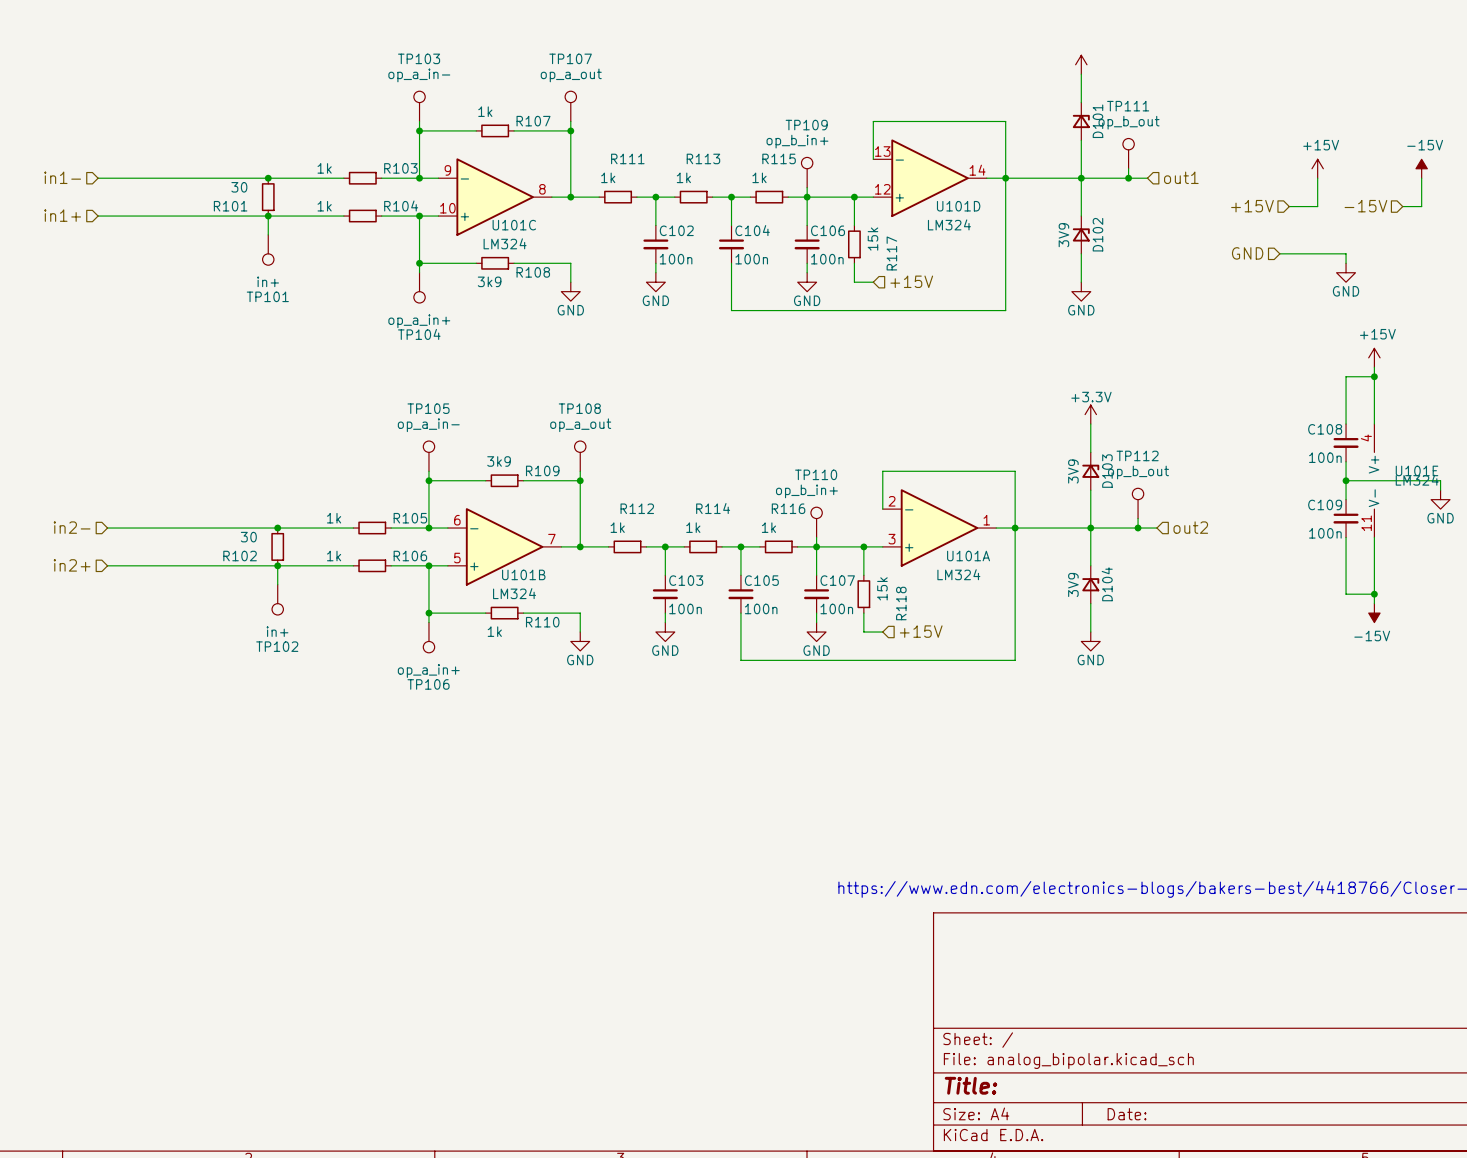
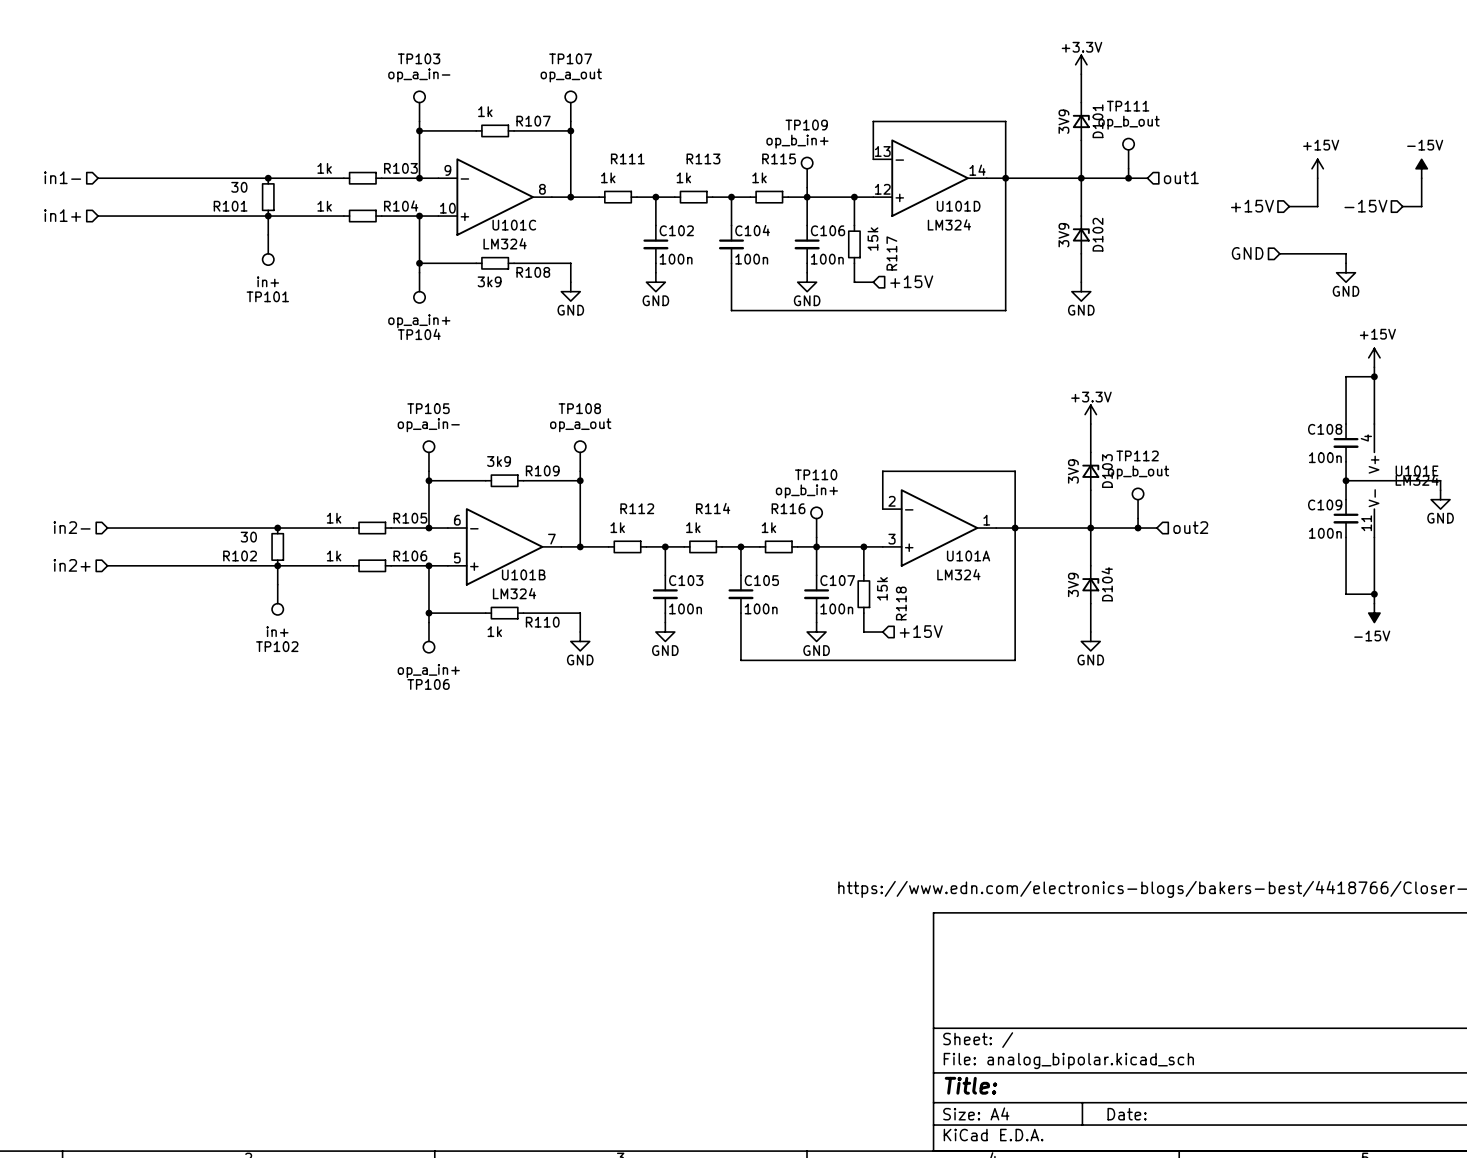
power symbol text: none -> +3.3V (1081, 47)
D101 value: none -> 3V9 (1063, 121)

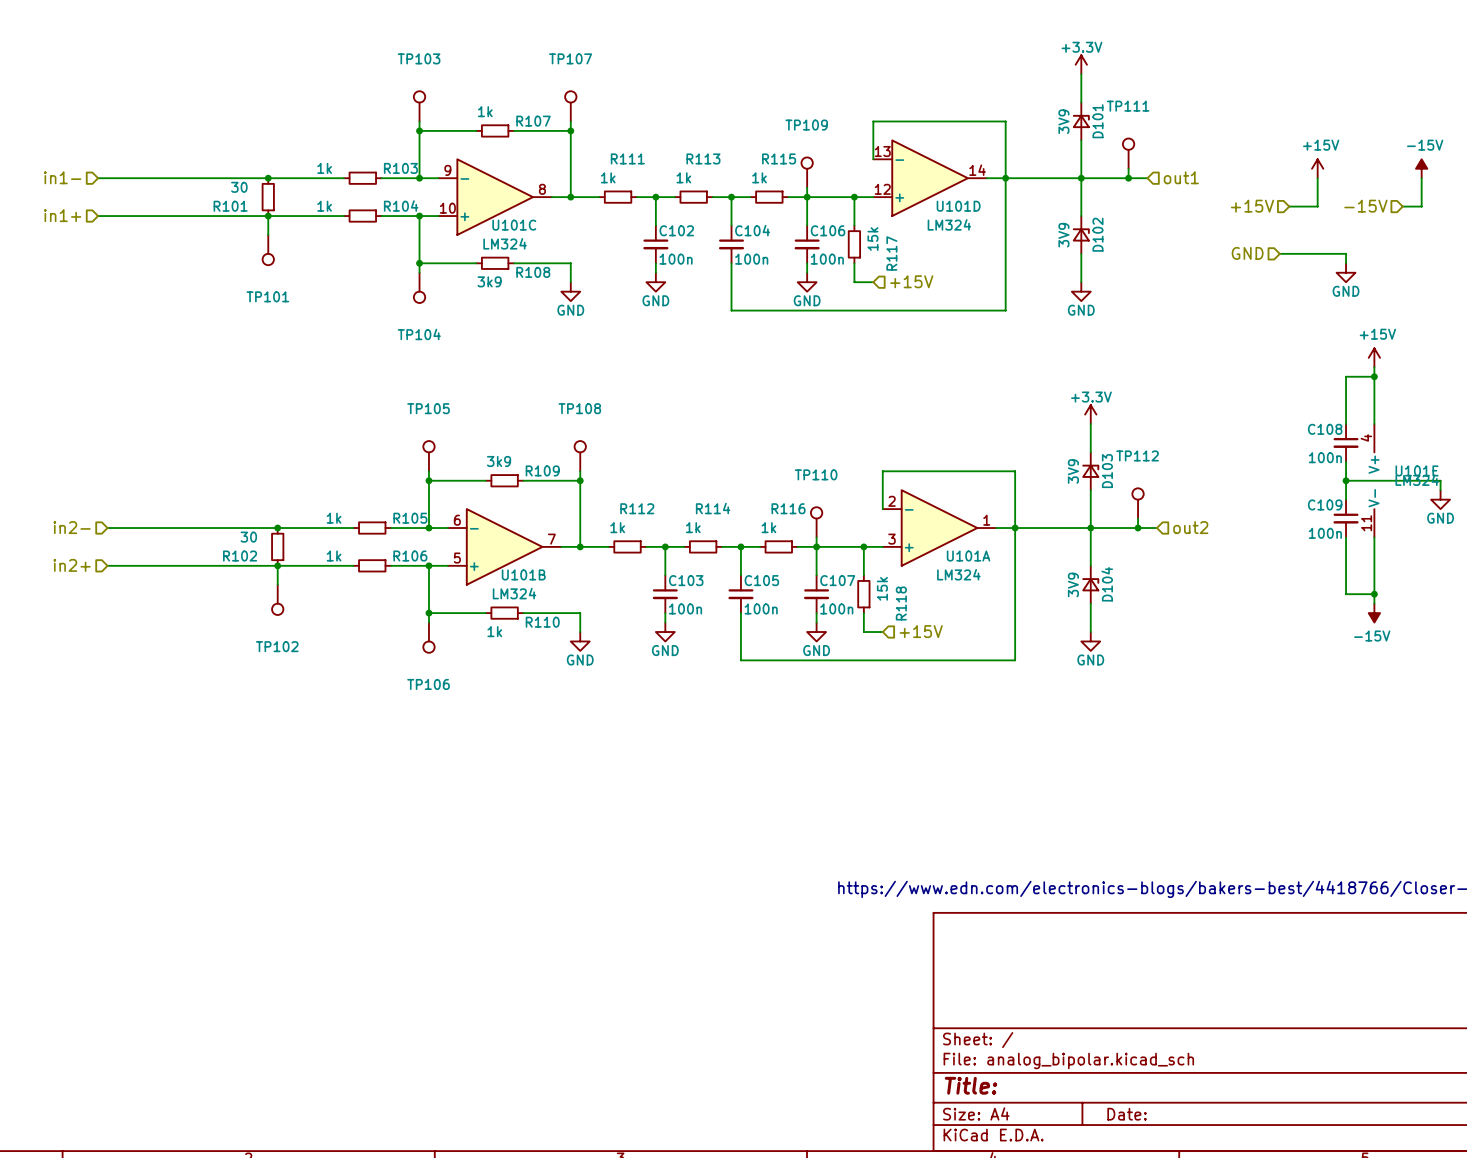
TP103 value: op_a_in- (419, 75) -> none
TP107 value: op_a_out (571, 75) -> none
TP111 value: op_b_out (1129, 122) -> none
TP109 value: op_b_in+ (797, 141) -> none
TP101 value: in+ (268, 281) -> none
TP104 value: op_a_in+ (419, 321) -> none
TP105 value: op_a_in- (428, 425) -> none
TP108 value: op_a_out (580, 425) -> none
TP112 value: op_b_out (1138, 472) -> none
TP110 value: op_b_in+ (806, 491) -> none
TP102 value: in+ (277, 631) -> none
TP106 value: op_a_in+ (428, 671) -> none

